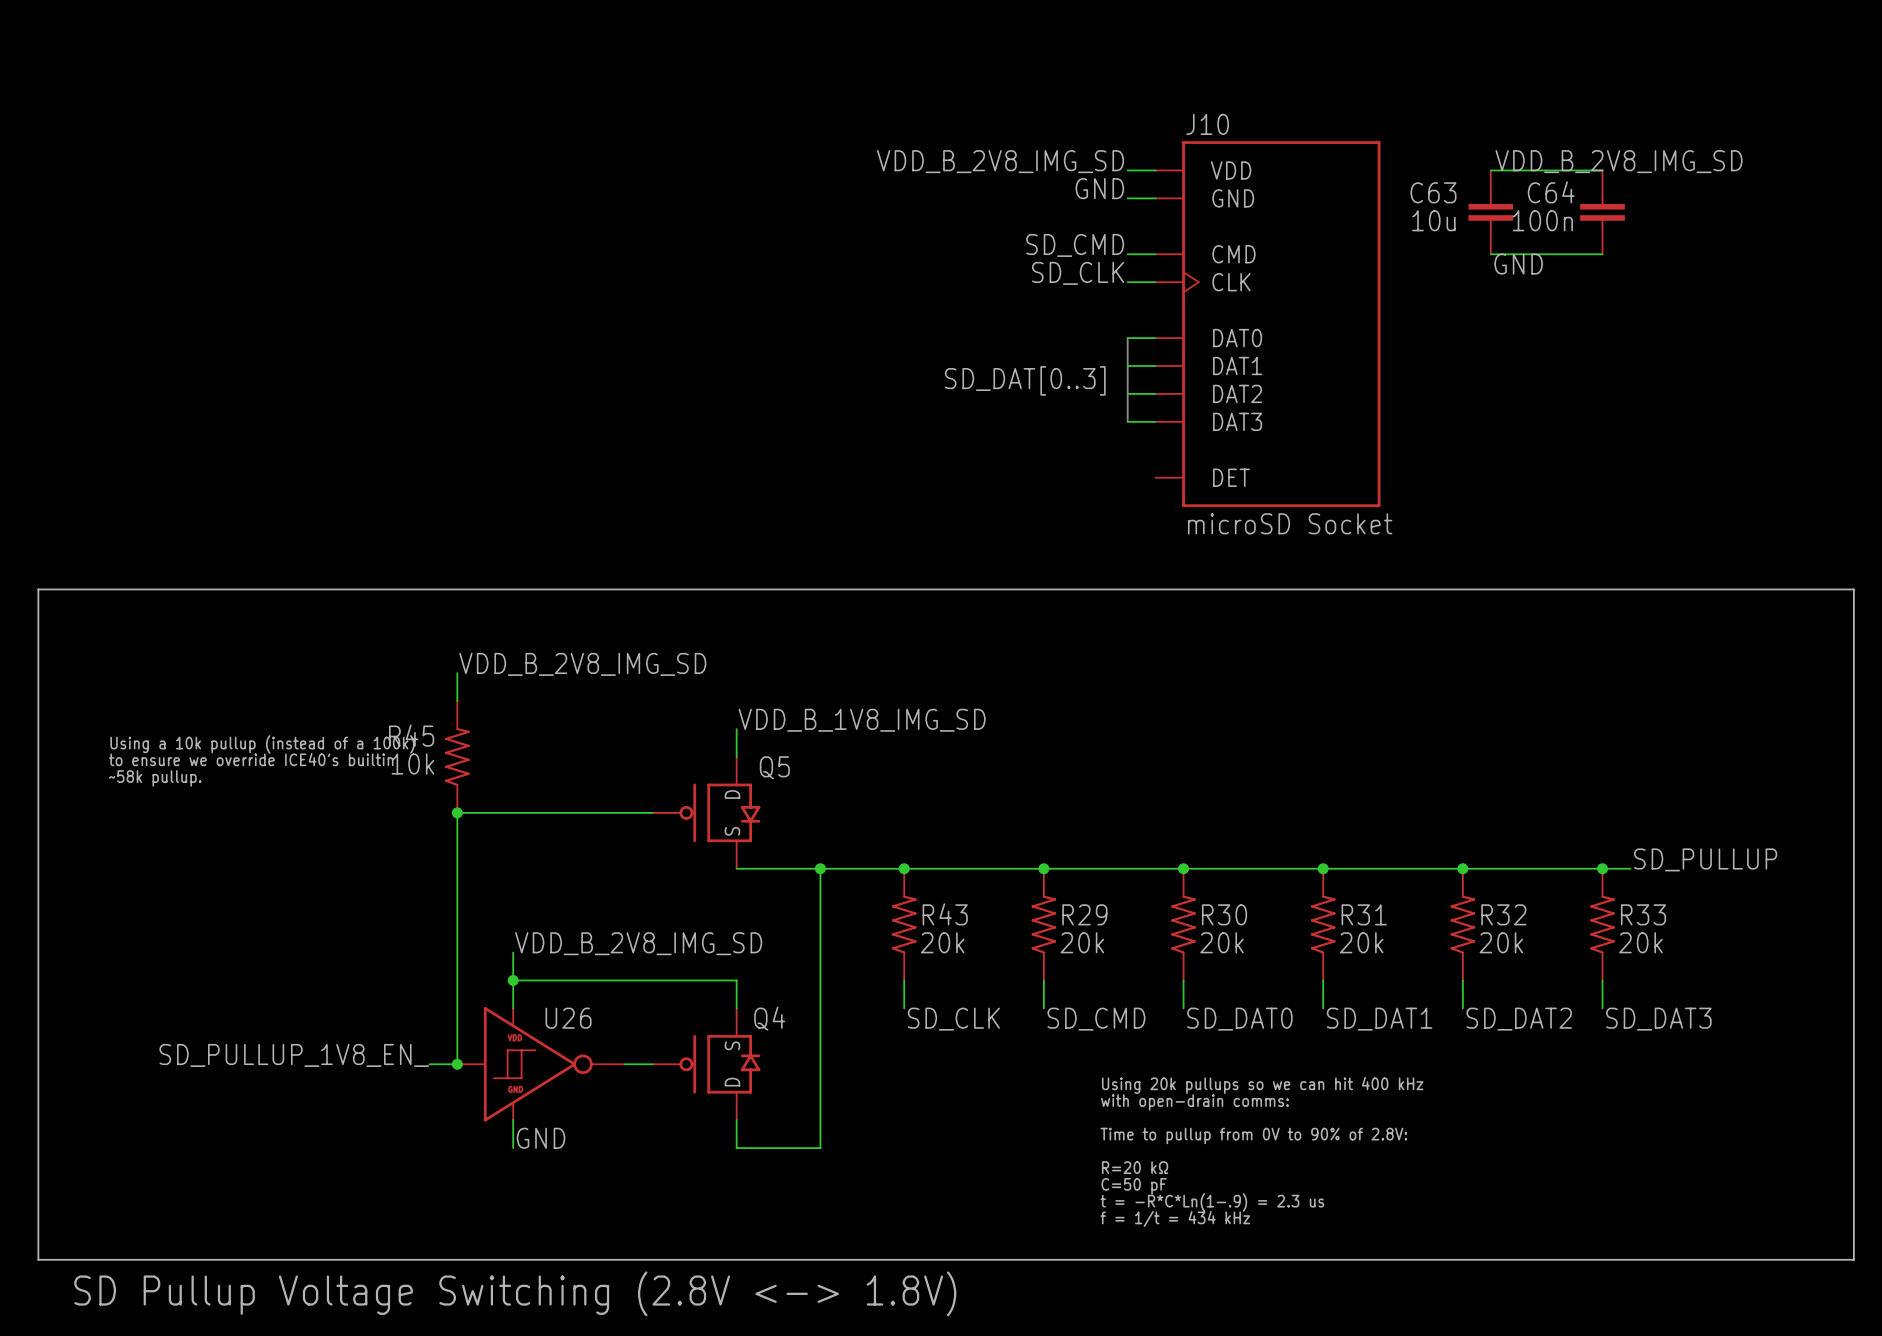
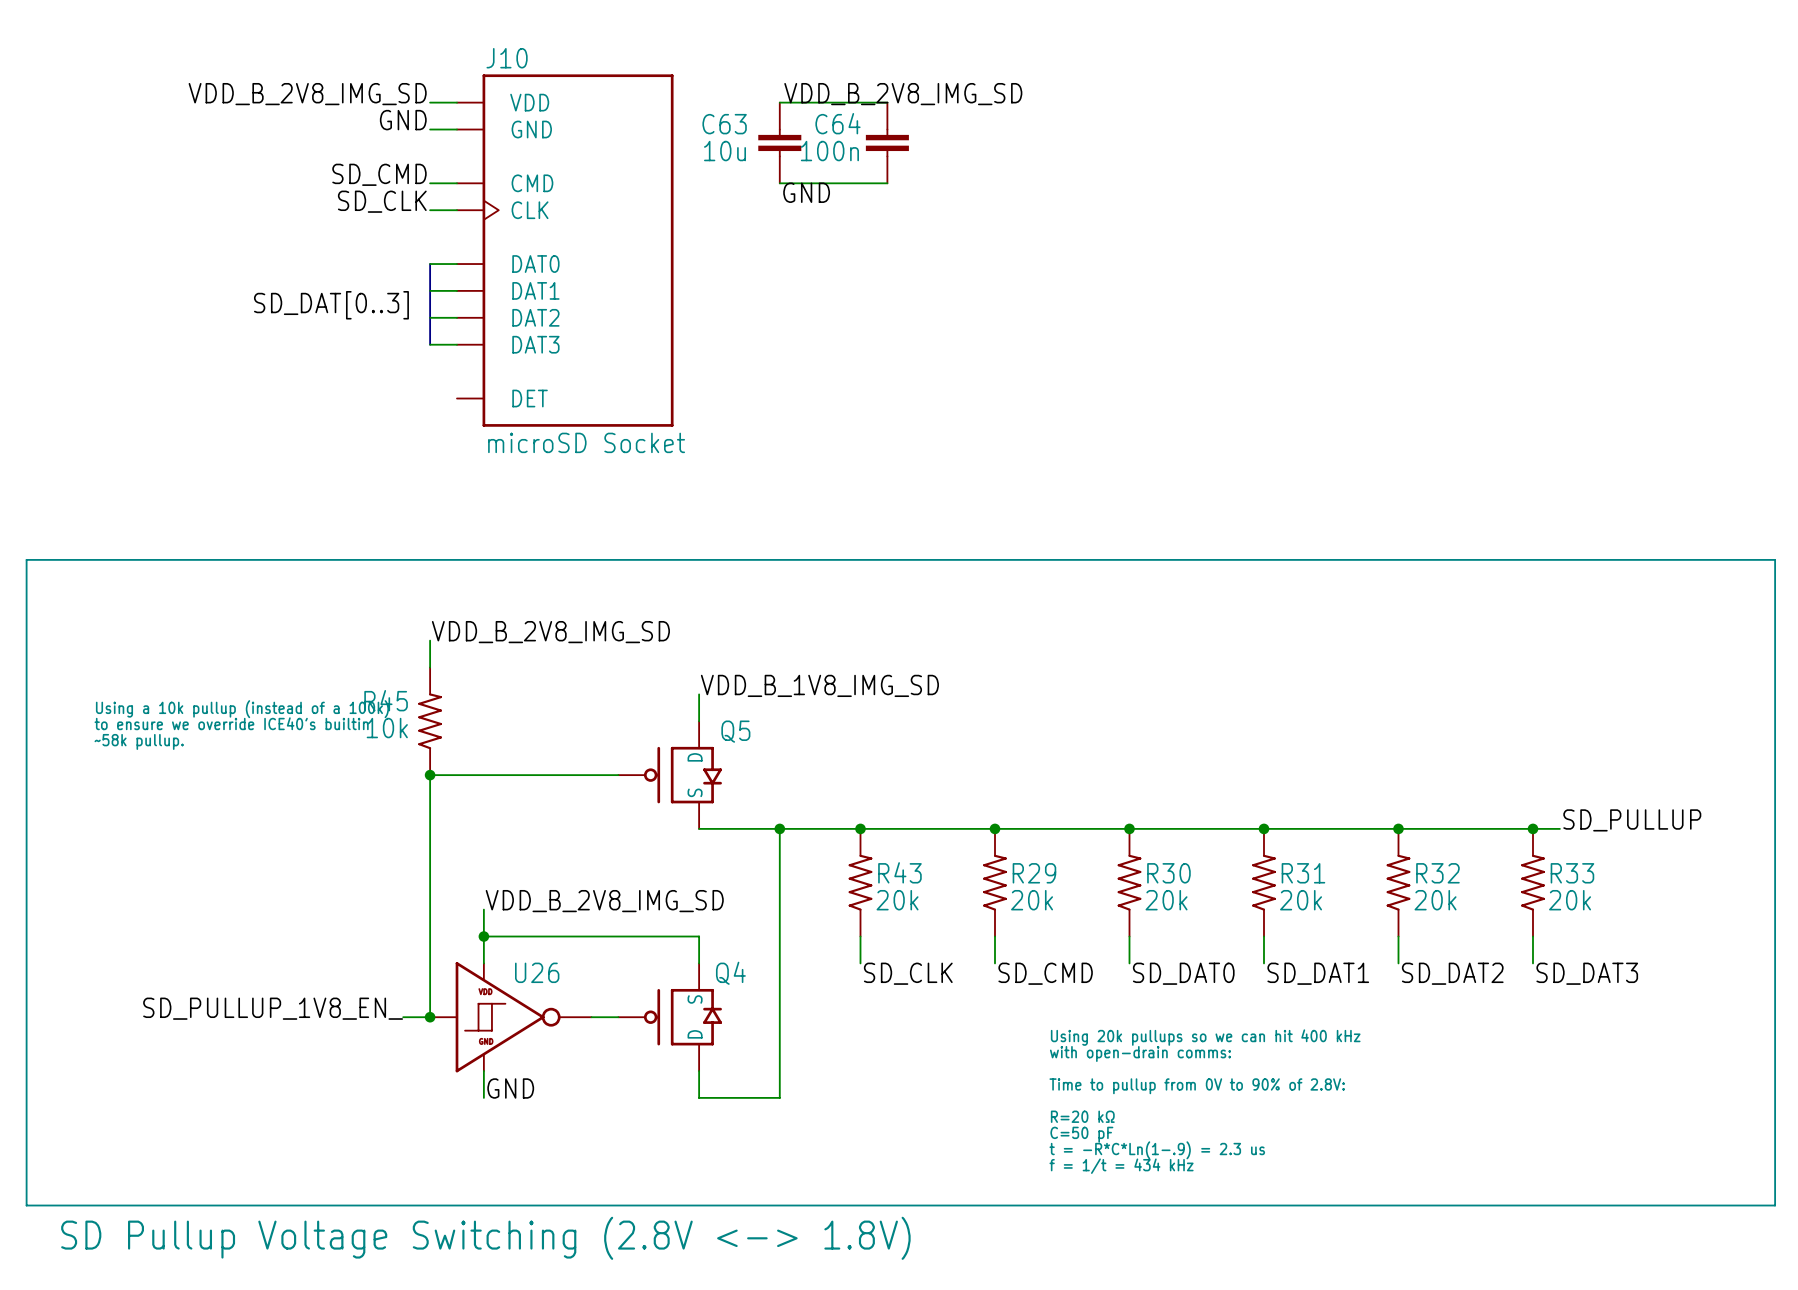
label: none -> VDD_B_2V8_IMG_SD (307, 94)
label: none -> VDD_B_2V8_IMG_SD (903, 94)
wire: none -> (430, 102) (457, 102)
wire: none -> (779, 102) (887, 102)
label: none -> GND (403, 120)
wire: none -> (430, 129) (457, 129)
label: VDD_B_2V8_IMG_SD (1000, 161) -> none
label: VDD_B_2V8_IMG_SD (1619, 161) -> none
wire: (1127, 170) (1155, 170) -> none
wire: (1490, 170) (1602, 170) -> none
label: GND (1099, 188) -> none
label: none -> SD_CMD (379, 174)
wire: none -> (430, 183) (457, 183)
wire: none -> (779, 183) (887, 183)
wire: (1127, 198) (1155, 198) -> none
label: none -> GND (806, 192)
C63 position: (1490, 212) -> (779, 142)
C64 position: (1602, 212) -> (887, 142)
label: none -> SD_CLK (382, 201)
wire: none -> (430, 210) (457, 210)
label: SD_CMD (1075, 245) -> none
wire: (1127, 254) (1155, 254) -> none
wire: (1490, 254) (1602, 254) -> none
label: GND (1518, 264) -> none
label: SD_CLK (1078, 273) -> none
bus: none -> (430, 264) (430, 344)
wire: none -> (430, 264) (457, 264)
wire: (1127, 282) (1155, 282) -> none
wire: none -> (430, 290) (457, 290)
J10 position: (1268, 324) -> (565, 250)
label: none -> SD_DAT[0..3] (331, 305)
wire: none -> (430, 317) (457, 317)
bus: (1127, 338) (1127, 421) -> none
wire: (1127, 338) (1155, 338) -> none
wire: none -> (430, 344) (457, 344)
wire: (1127, 365) (1155, 365) -> none
label: SD_DAT[0..3] (1025, 380) -> none
wire: (1127, 393) (1155, 393) -> none
wire: (1127, 421) (1155, 421) -> none

